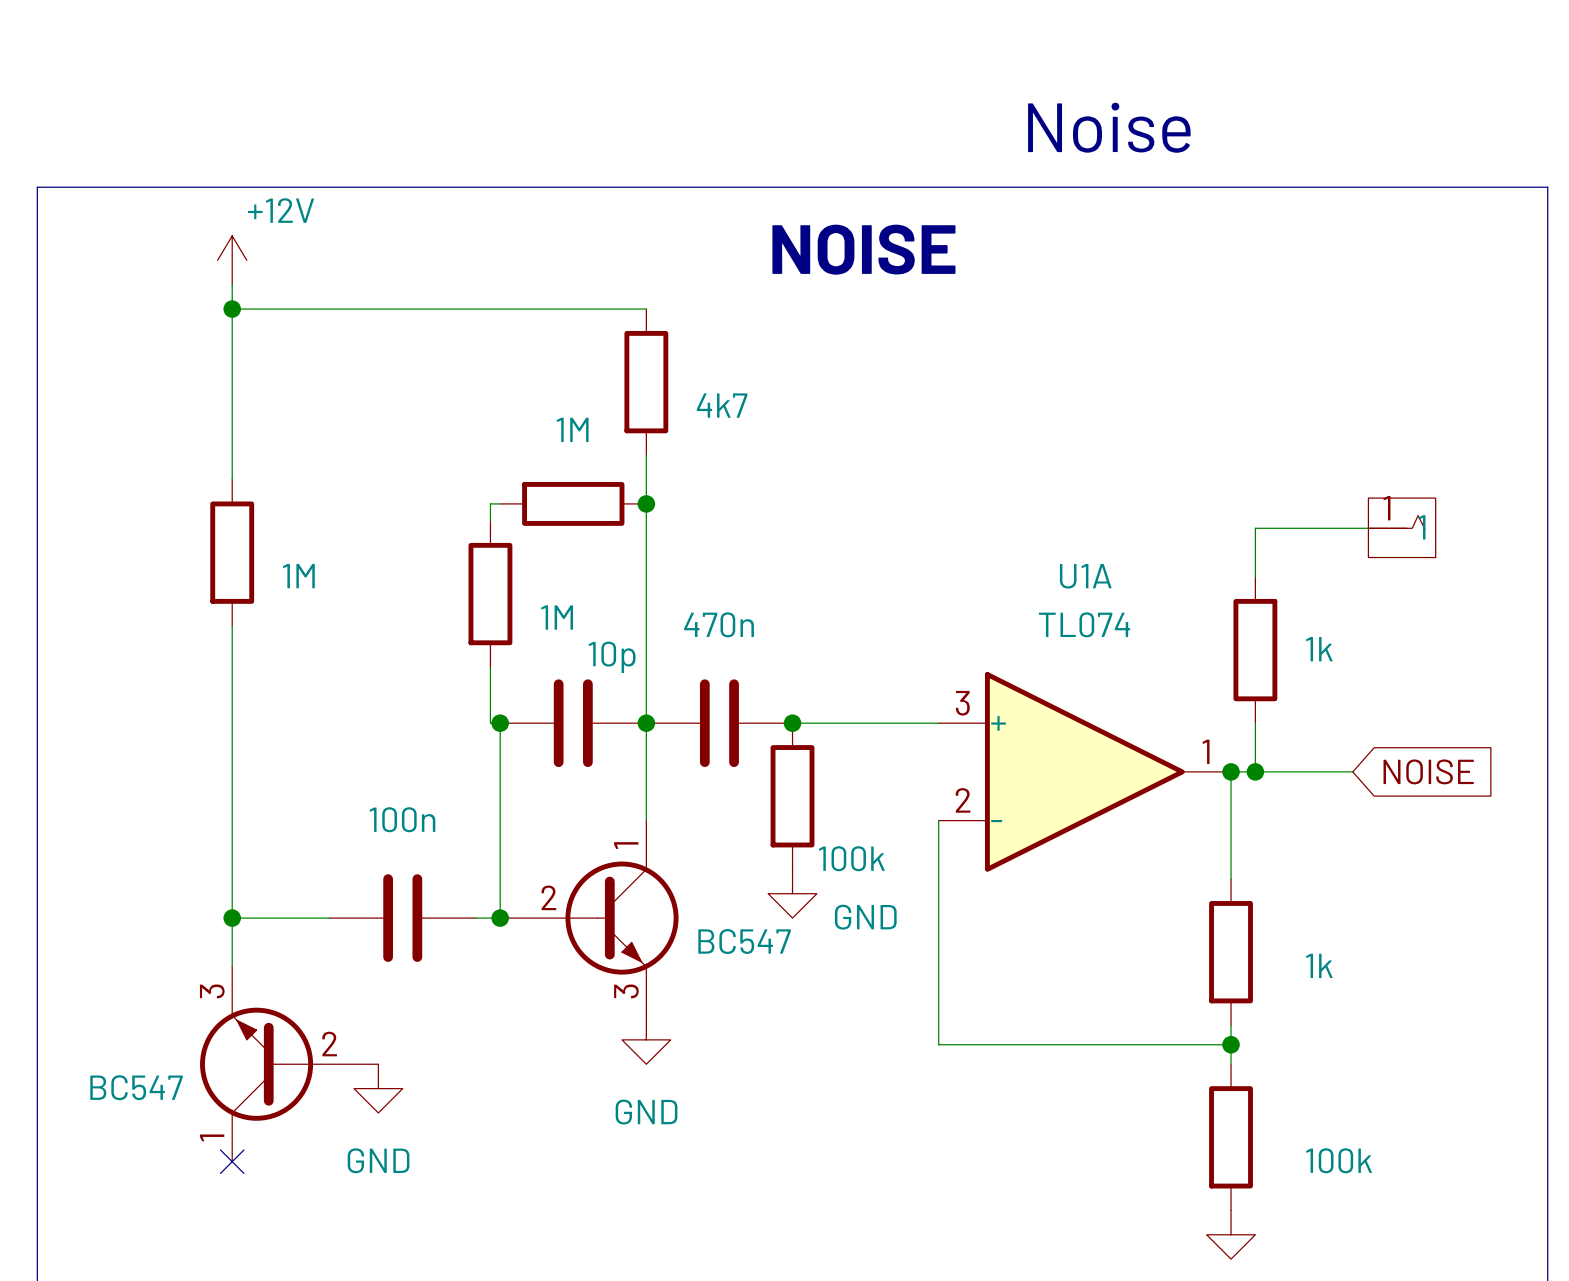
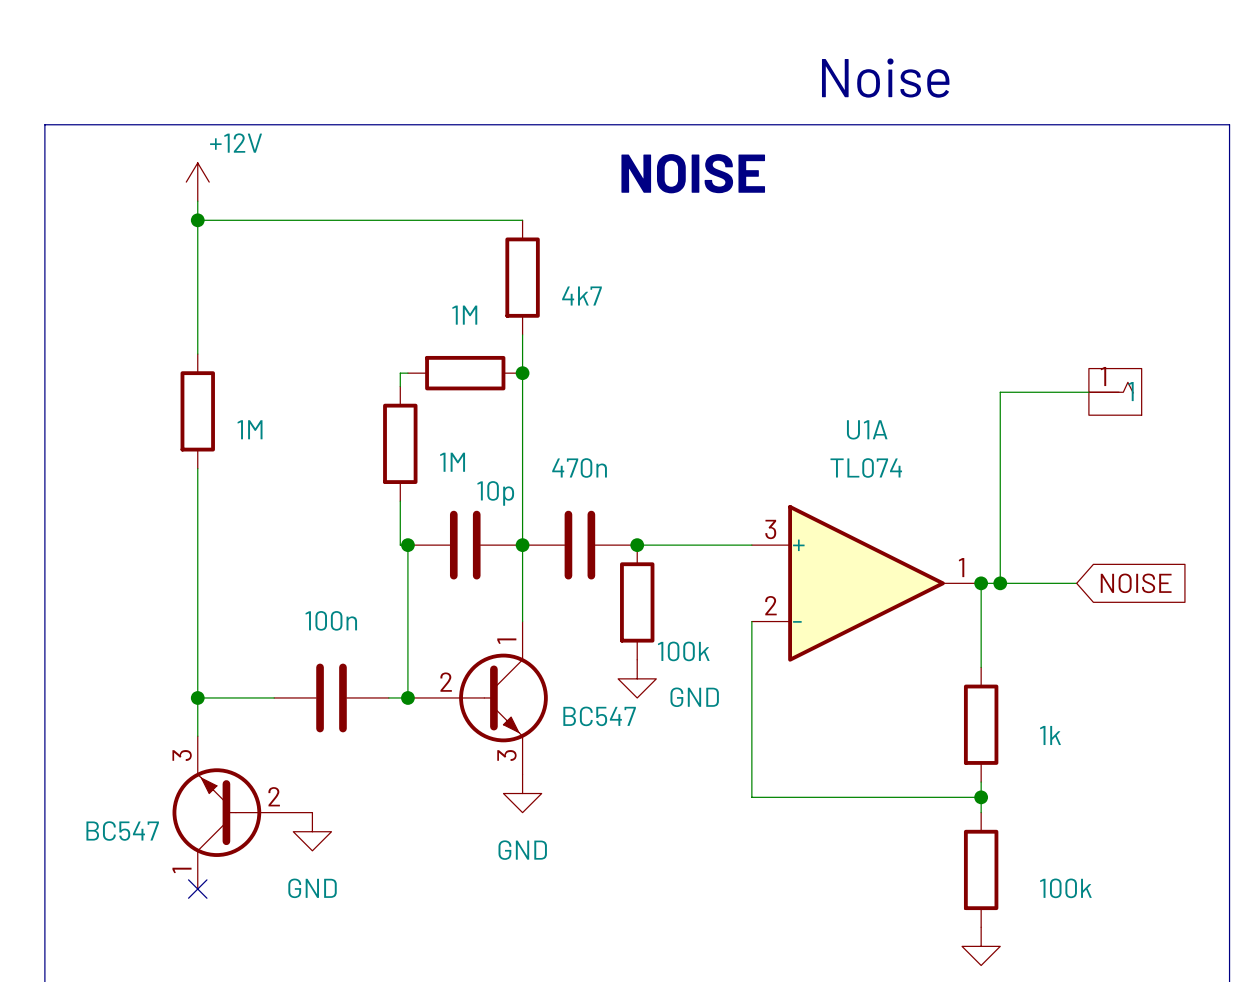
wire: none -> (1000, 430) (1000, 545)
part: 1k (1255, 650) -> none

